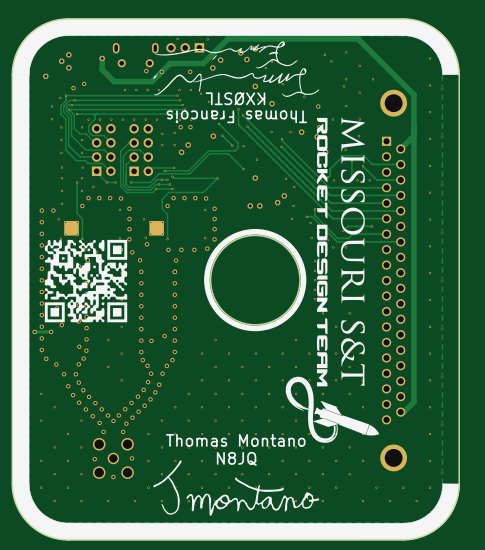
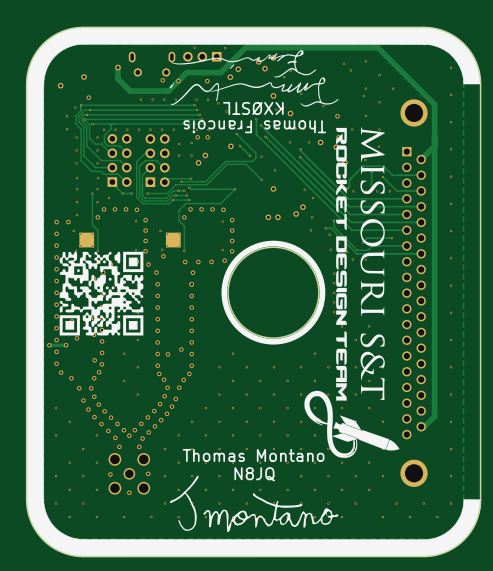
via: (68, 54) -> none
via: (61, 61) -> none
via: (84, 83) -> none

